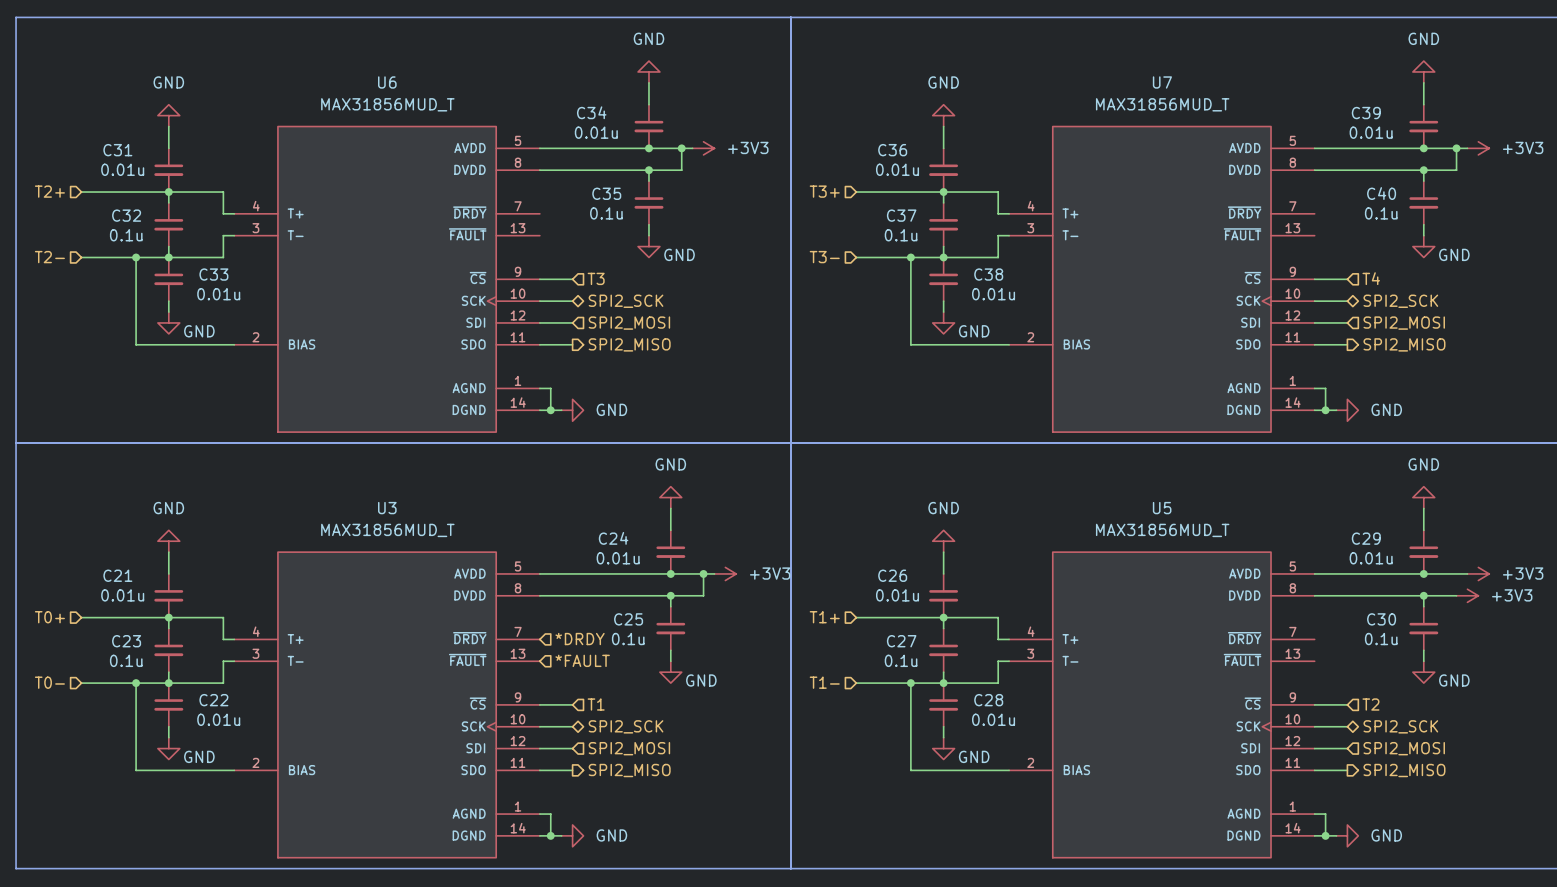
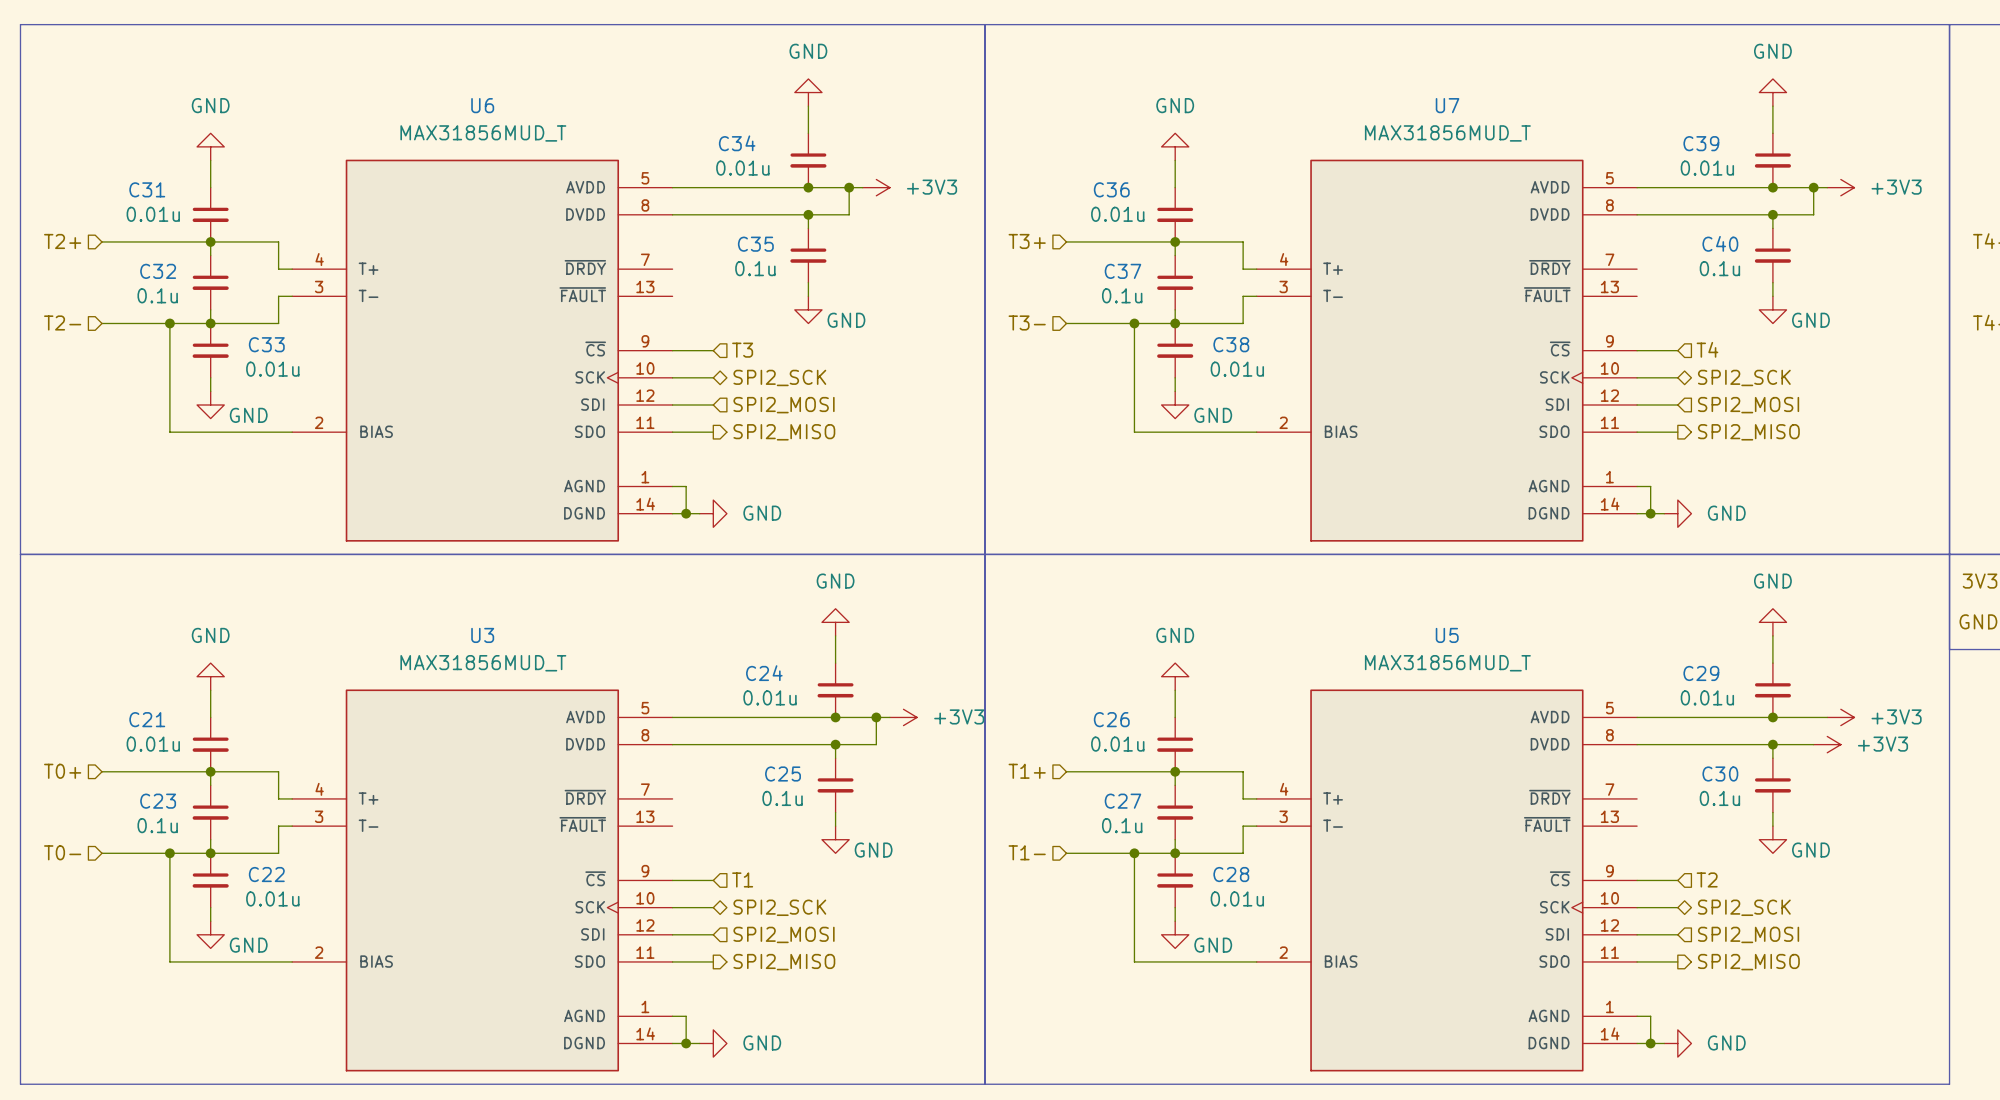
hierarchical label: *DRDY (580, 639) -> none
hierarchical label: *FAULT (582, 660) -> none

